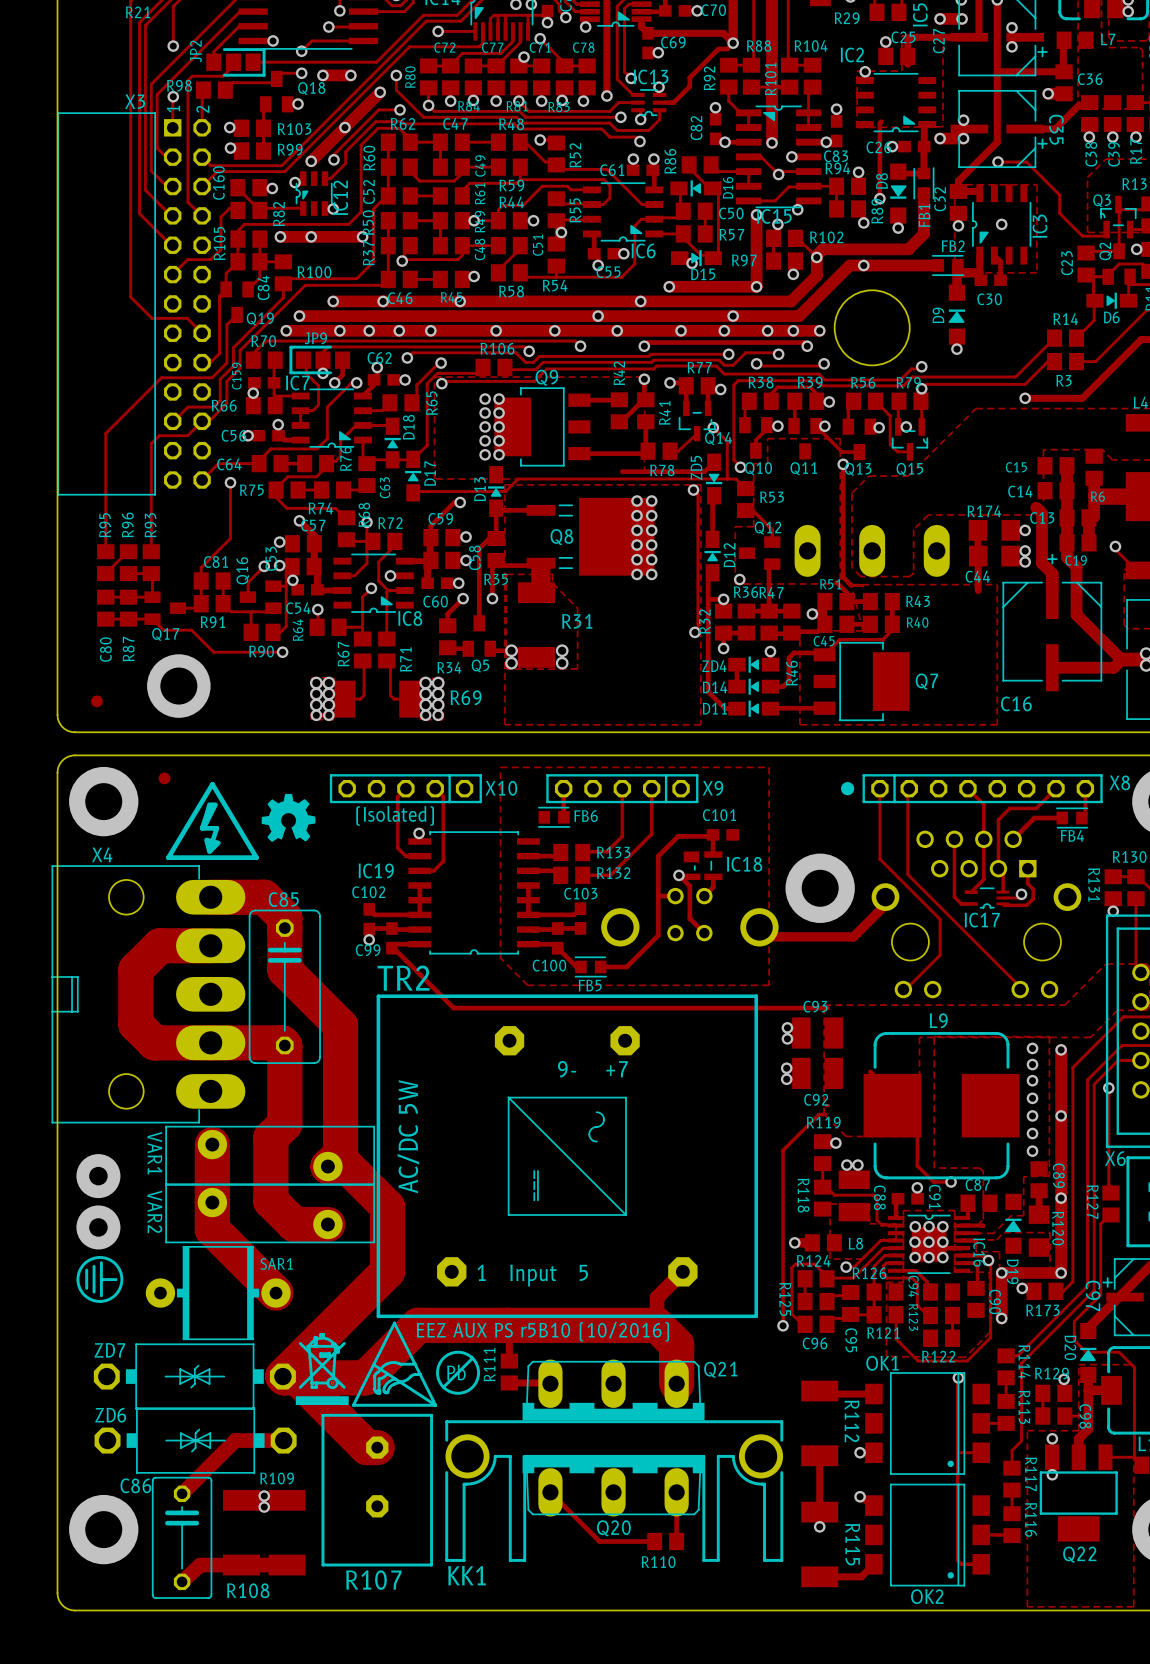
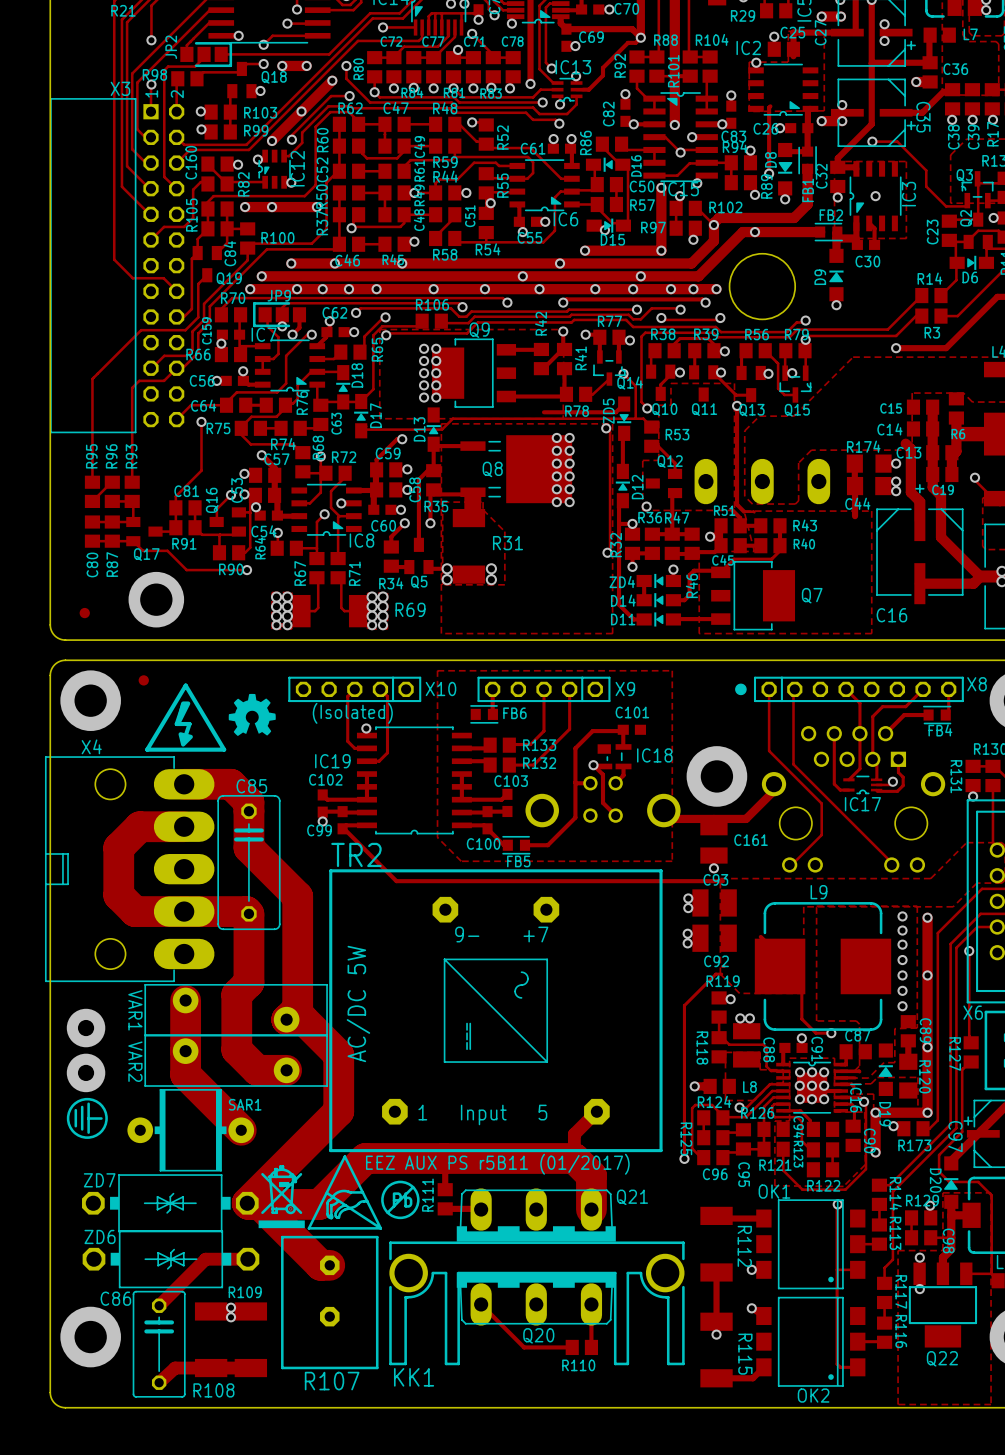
C161: none -> (713, 841)
via: none -> (713, 868)
text: EEZ AUX PS r5B10 (10/2016) (542, 1331) -> EEZ AUX PS r5B11 (01/2017) (497, 1164)

